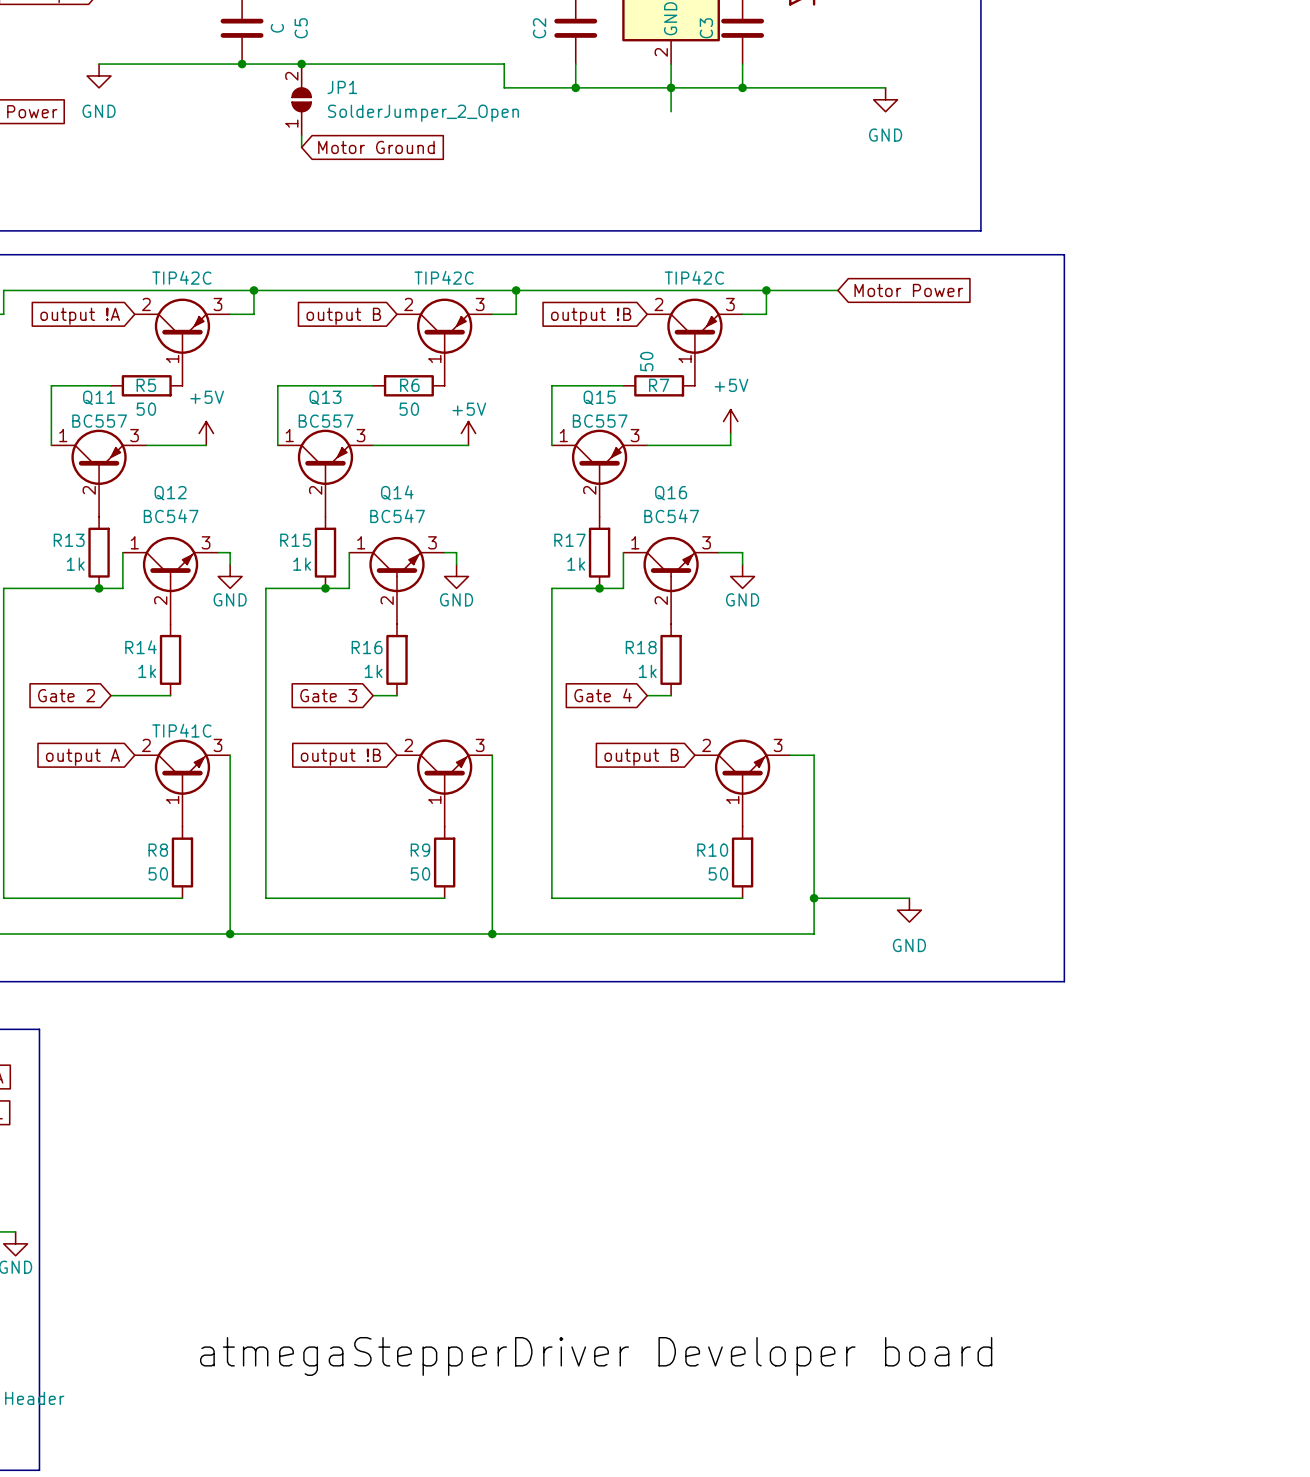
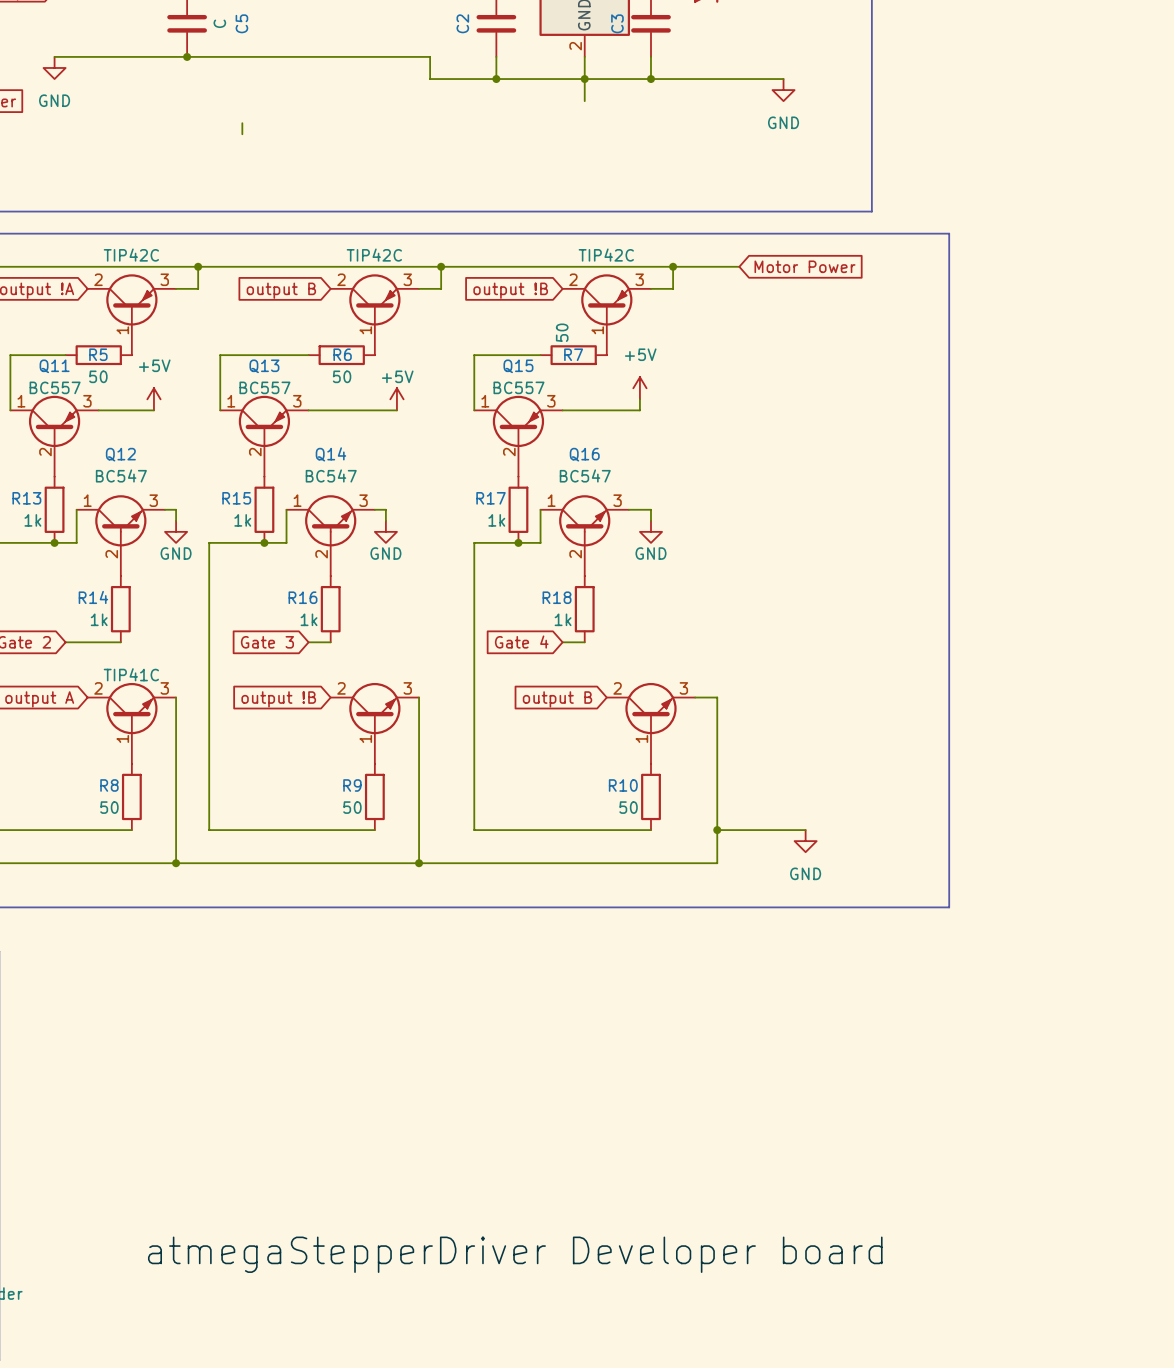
junction: (301, 64) -> none
JP1: SolderJumper_2_Open (301, 99) -> none
global label: Motor Ground (376, 147) -> none

